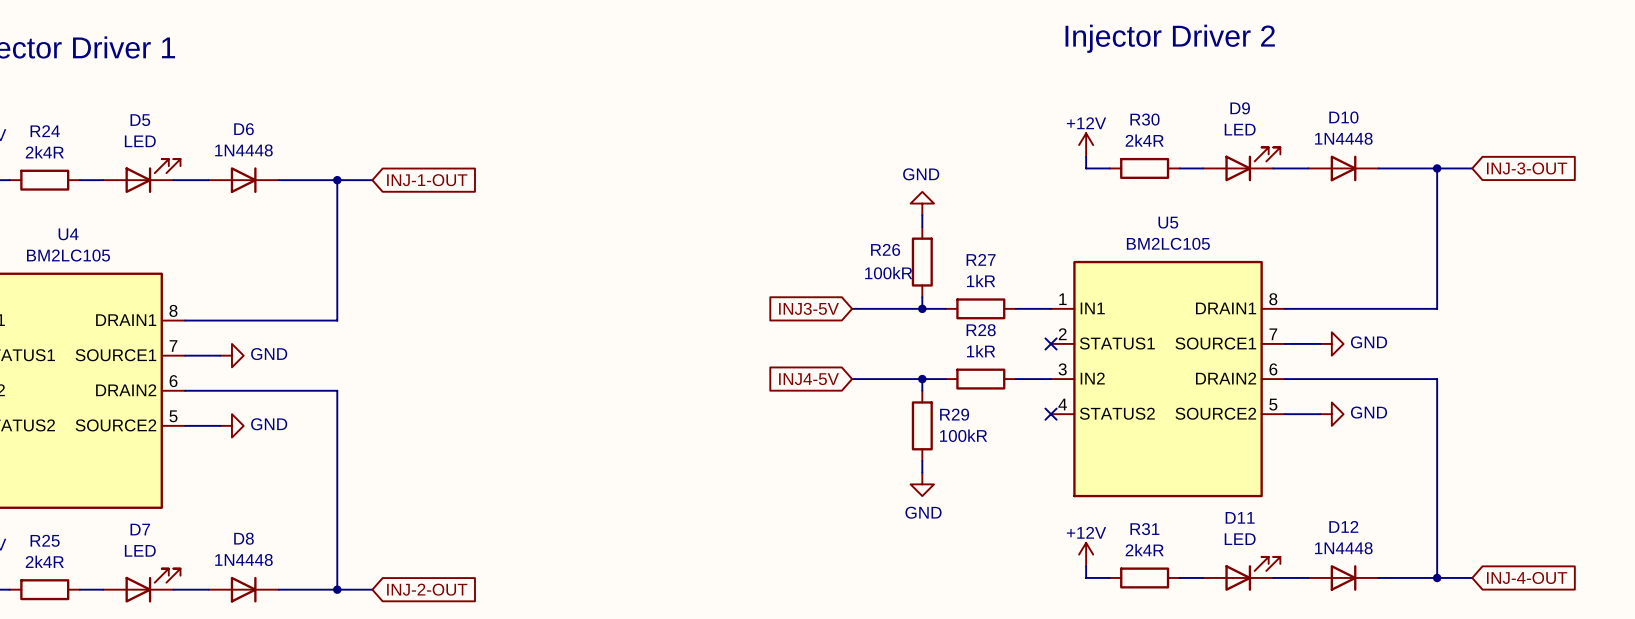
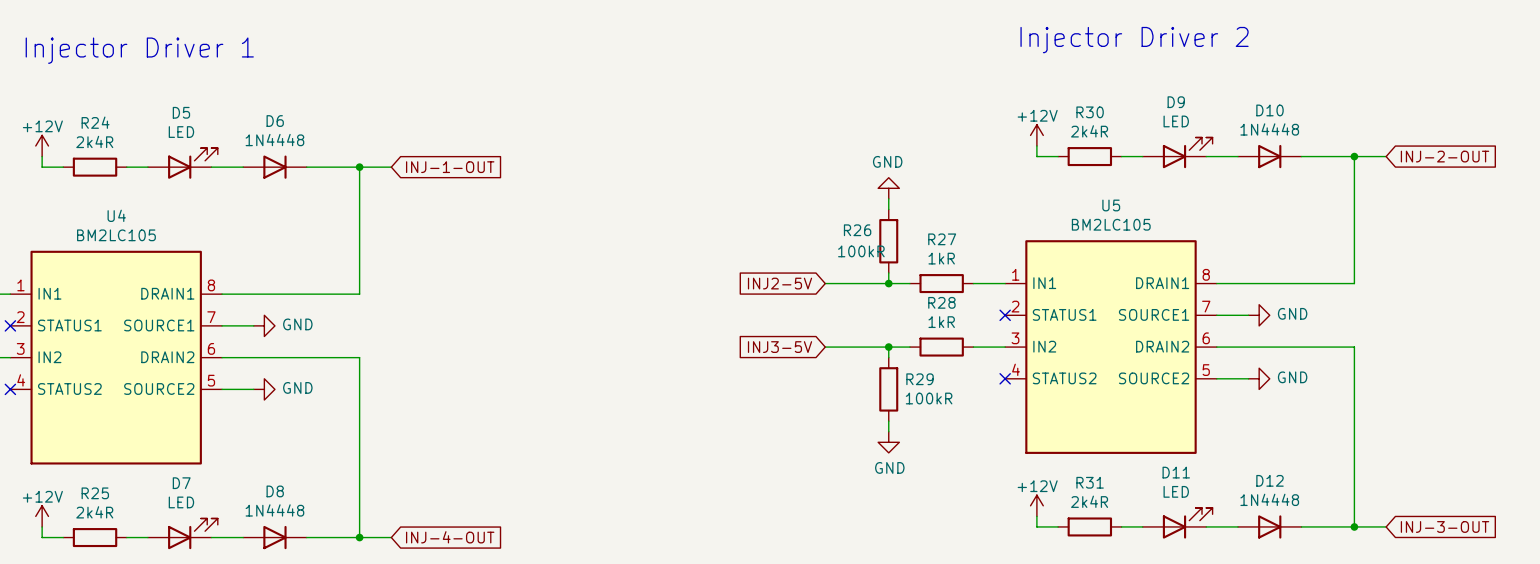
global label: INJ-3-OUT (1527, 168) -> INJ-2-OUT (1445, 156)
global label: INJ3-5V (808, 308) -> INJ2-5V (780, 283)
global label: INJ4-5V (808, 379) -> INJ3-5V (780, 347)
global label: INJ-4-OUT (1527, 577) -> INJ-3-OUT (1445, 526)
global label: INJ-2-OUT (427, 589) -> INJ-4-OUT (450, 537)

